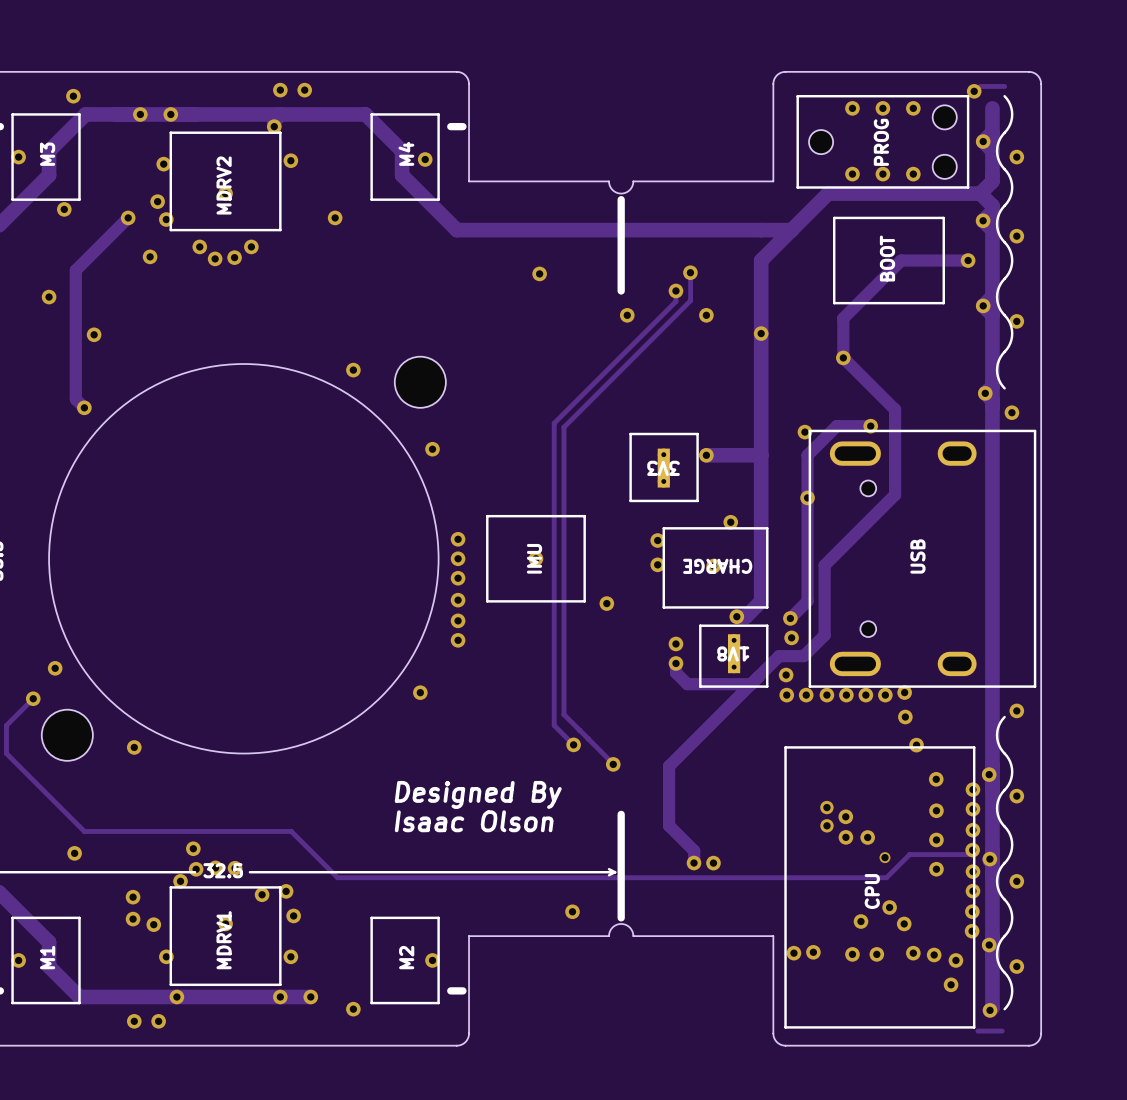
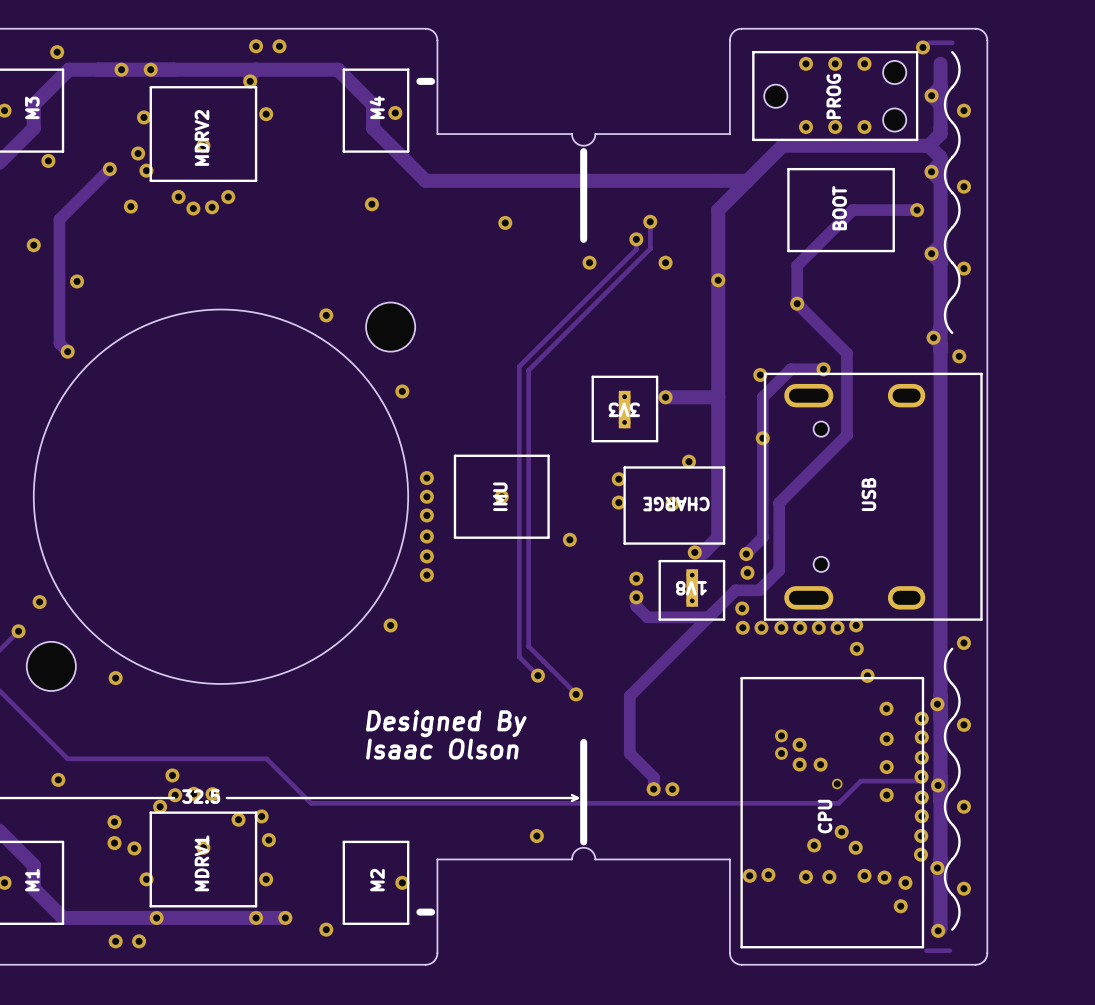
via position: (335, 217) -> (371, 204)

